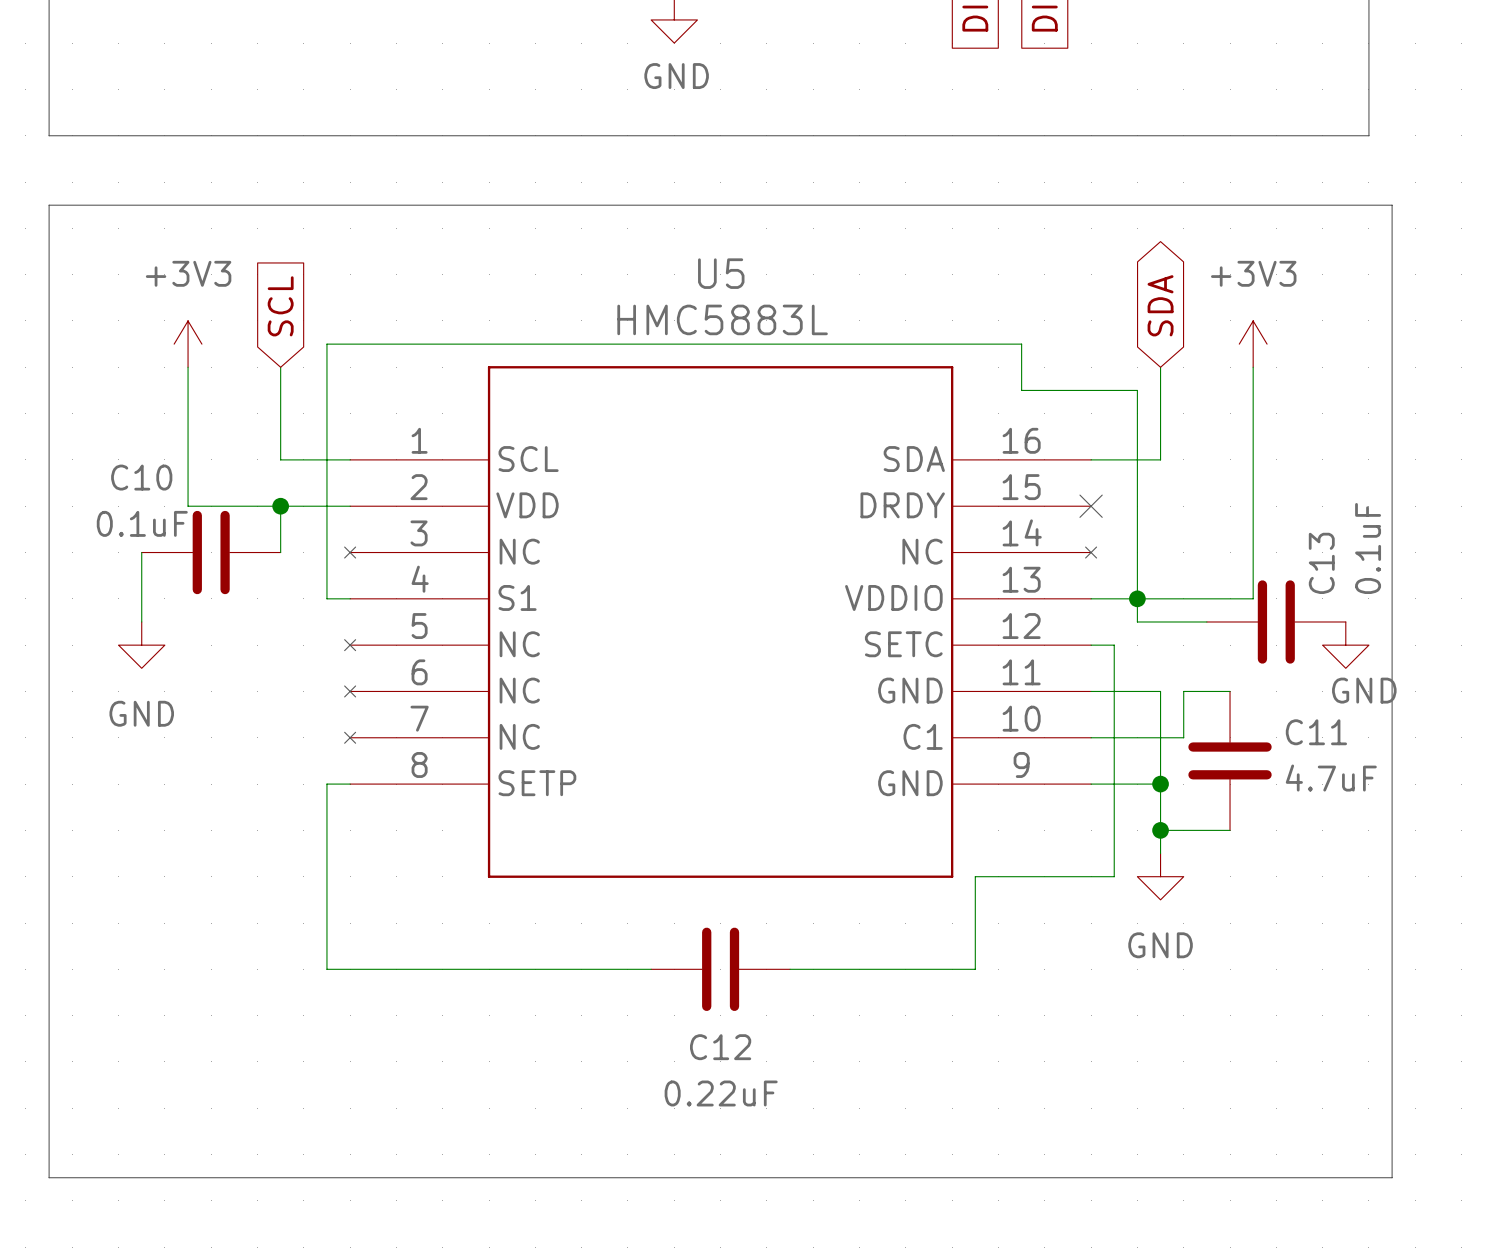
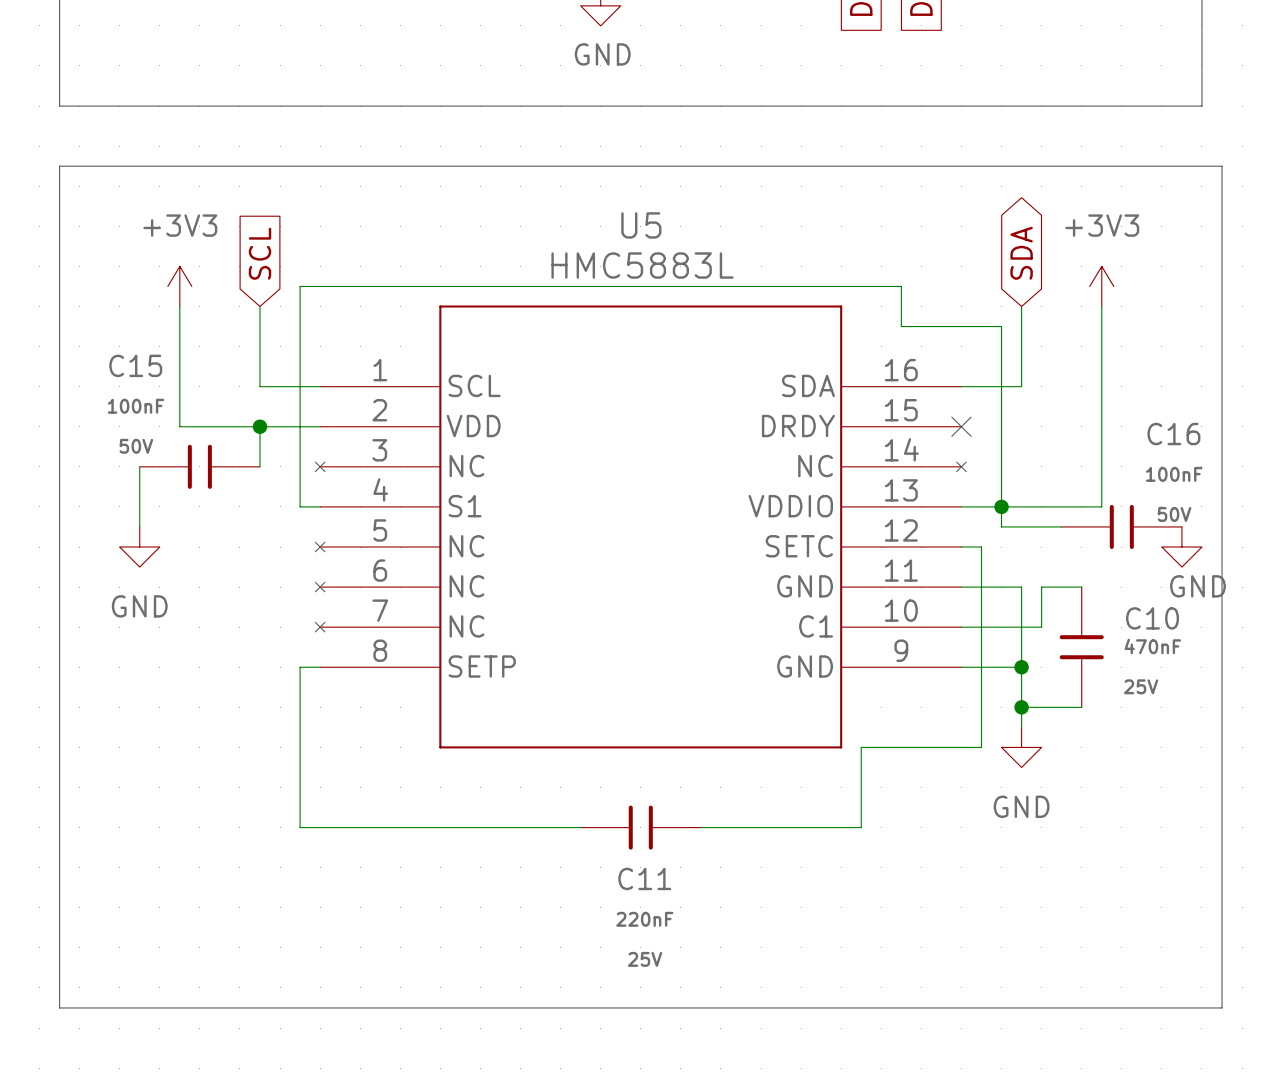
C10 name position: C10 (141, 477) -> C10 (1152, 618)
C10 symbol: [141, 510, 281, 595] -> [1059, 587, 1104, 708]
C10 value: 0.1uF (142, 523) -> 470nF (1152, 646)
C15: none -> 100nF (199, 466)
C13: 0.1uF (1276, 621) -> none
C16: none -> 100nF (1121, 526)
C11 symbol: [1188, 691, 1272, 831] -> [580, 805, 701, 850]
C11 name position: C11 (1316, 732) -> C11 (644, 878)
C11 value: 4.7uF (1331, 778) -> 220nF (644, 919)
C10 text: none -> 25V (1141, 686)
C12: 0.22uF (720, 969) -> none
C11 text: none -> 25V (645, 959)

